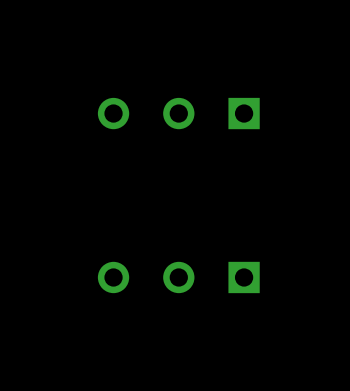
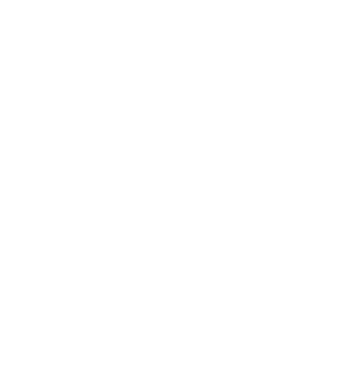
part: (178, 113) -> none
part: (178, 277) -> none

